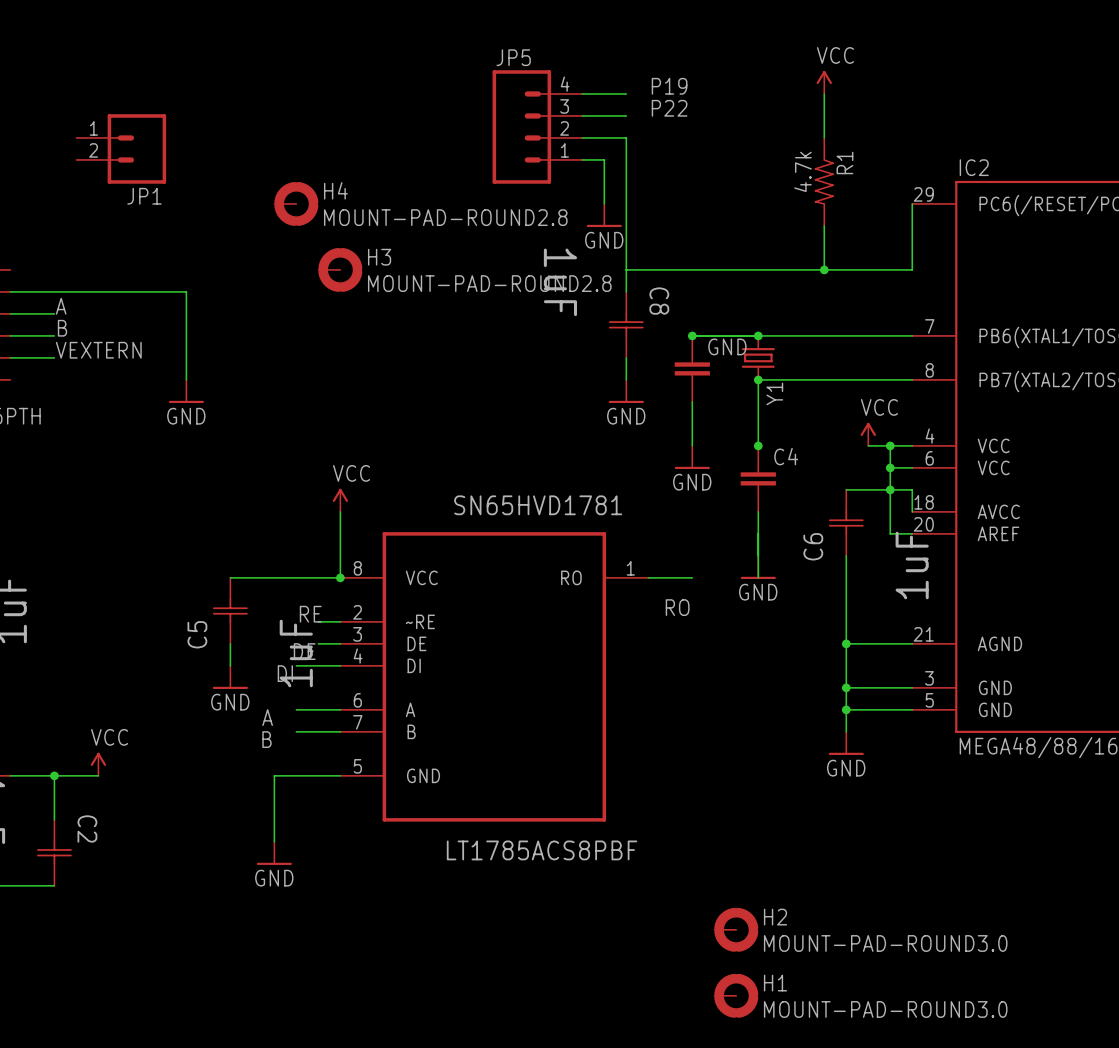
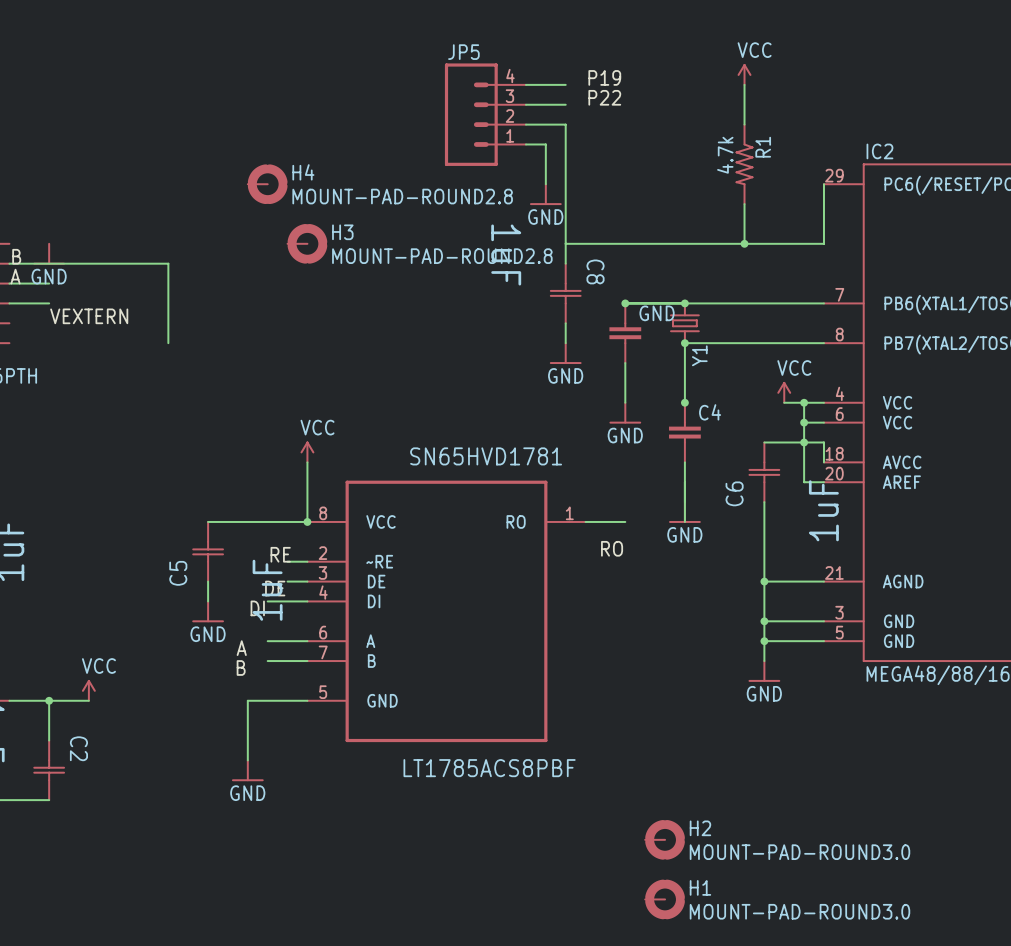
JP1: (121, 148) -> none
label position: A (61, 306) -> A (15, 276)
label position: B (62, 328) -> B (16, 256)
wire: (10, 357) (54, 357) -> none
power symbol position: GND (186, 391) -> GND (49, 254)

